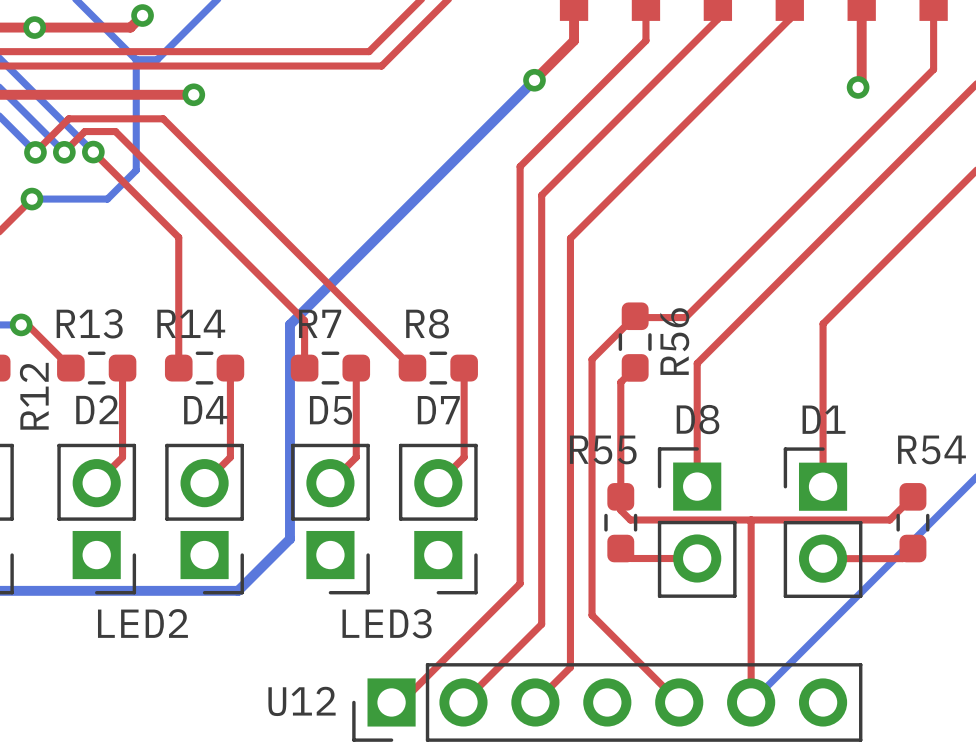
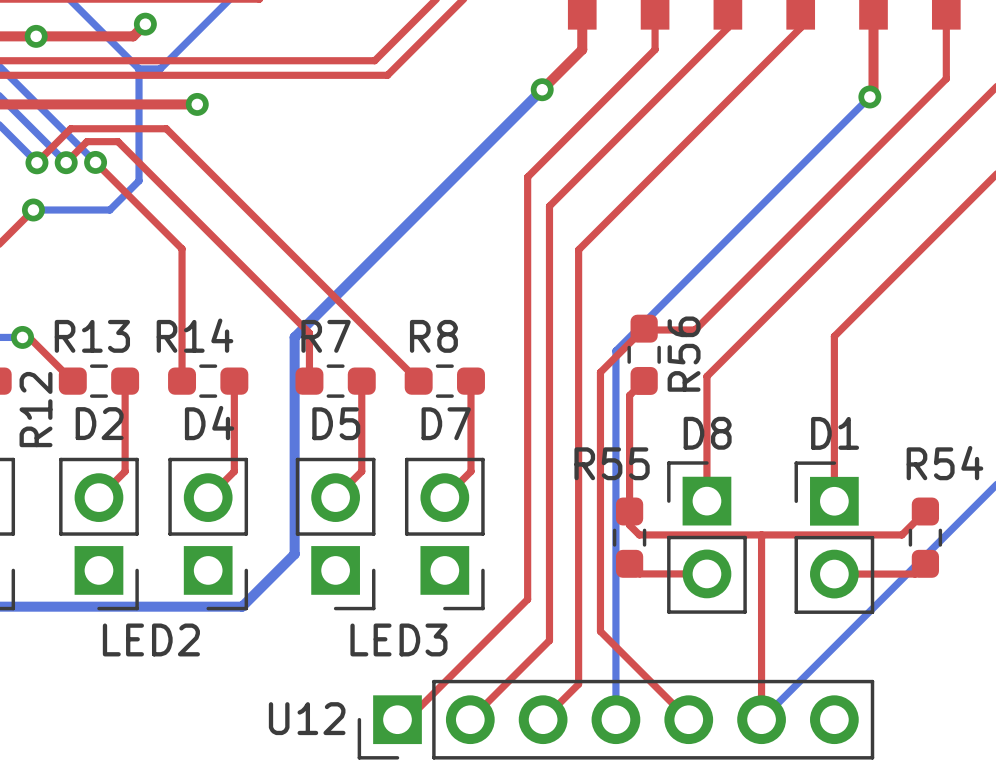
bottom track: none -> (869, 96) (615, 350) (615, 719)

